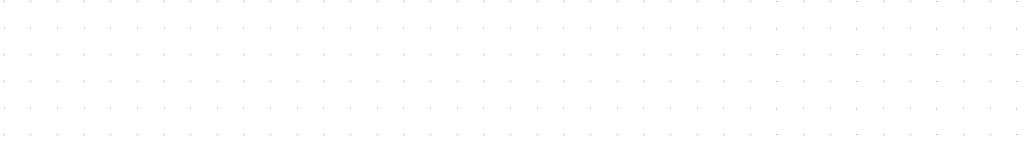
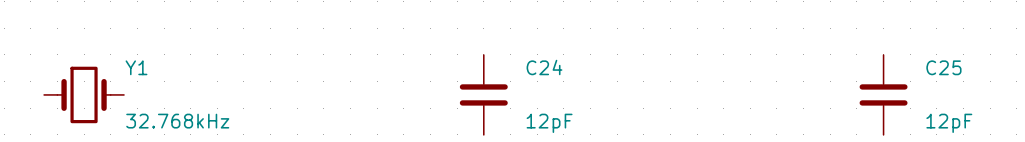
Y1: none -> 32.768kHz (84, 94)
C24: none -> 12pF (483, 94)
C25: none -> 12pF (883, 94)

